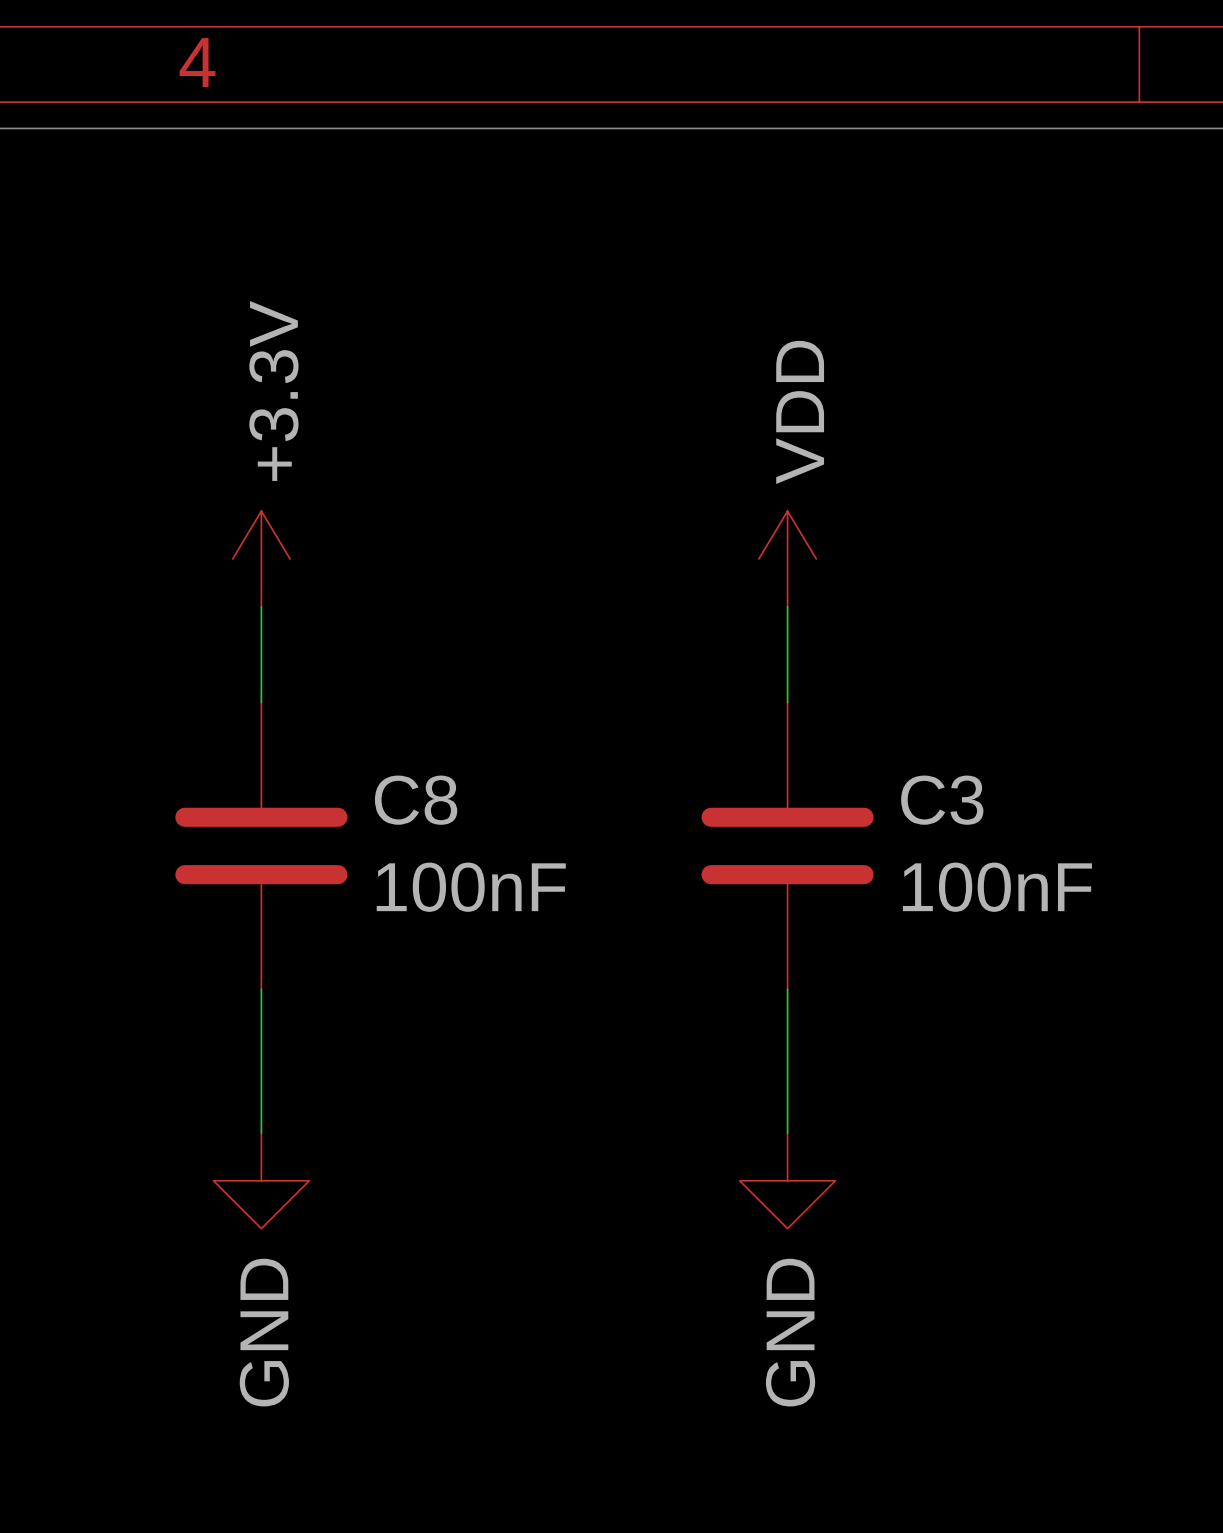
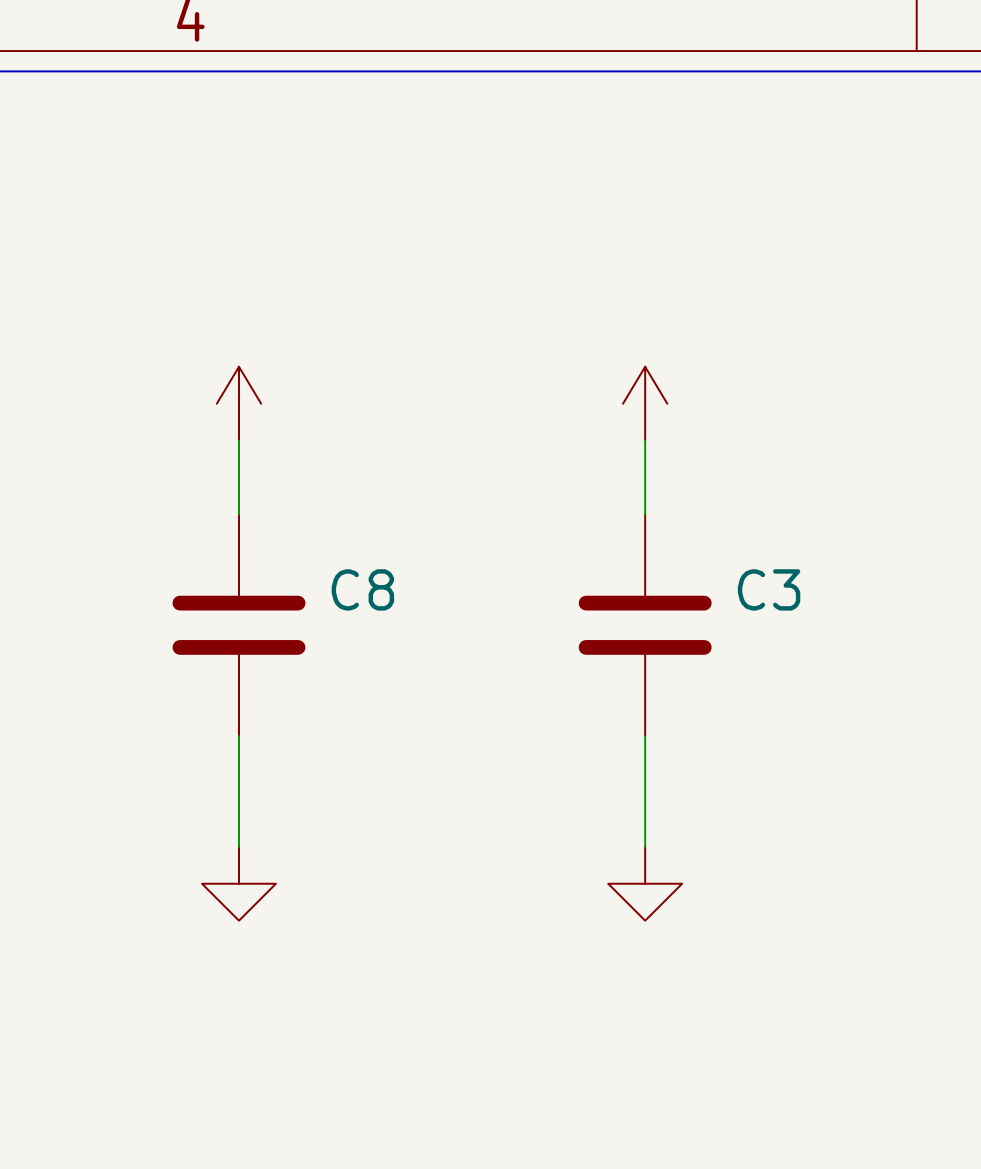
power symbol text: +3.3V (273, 390) -> none
power symbol text: VDD (800, 412) -> none
C8 value: 100nF (471, 887) -> none
C3 value: 100nF (997, 887) -> none
power symbol text: GND (264, 1332) -> none
power symbol text: GND (790, 1332) -> none

